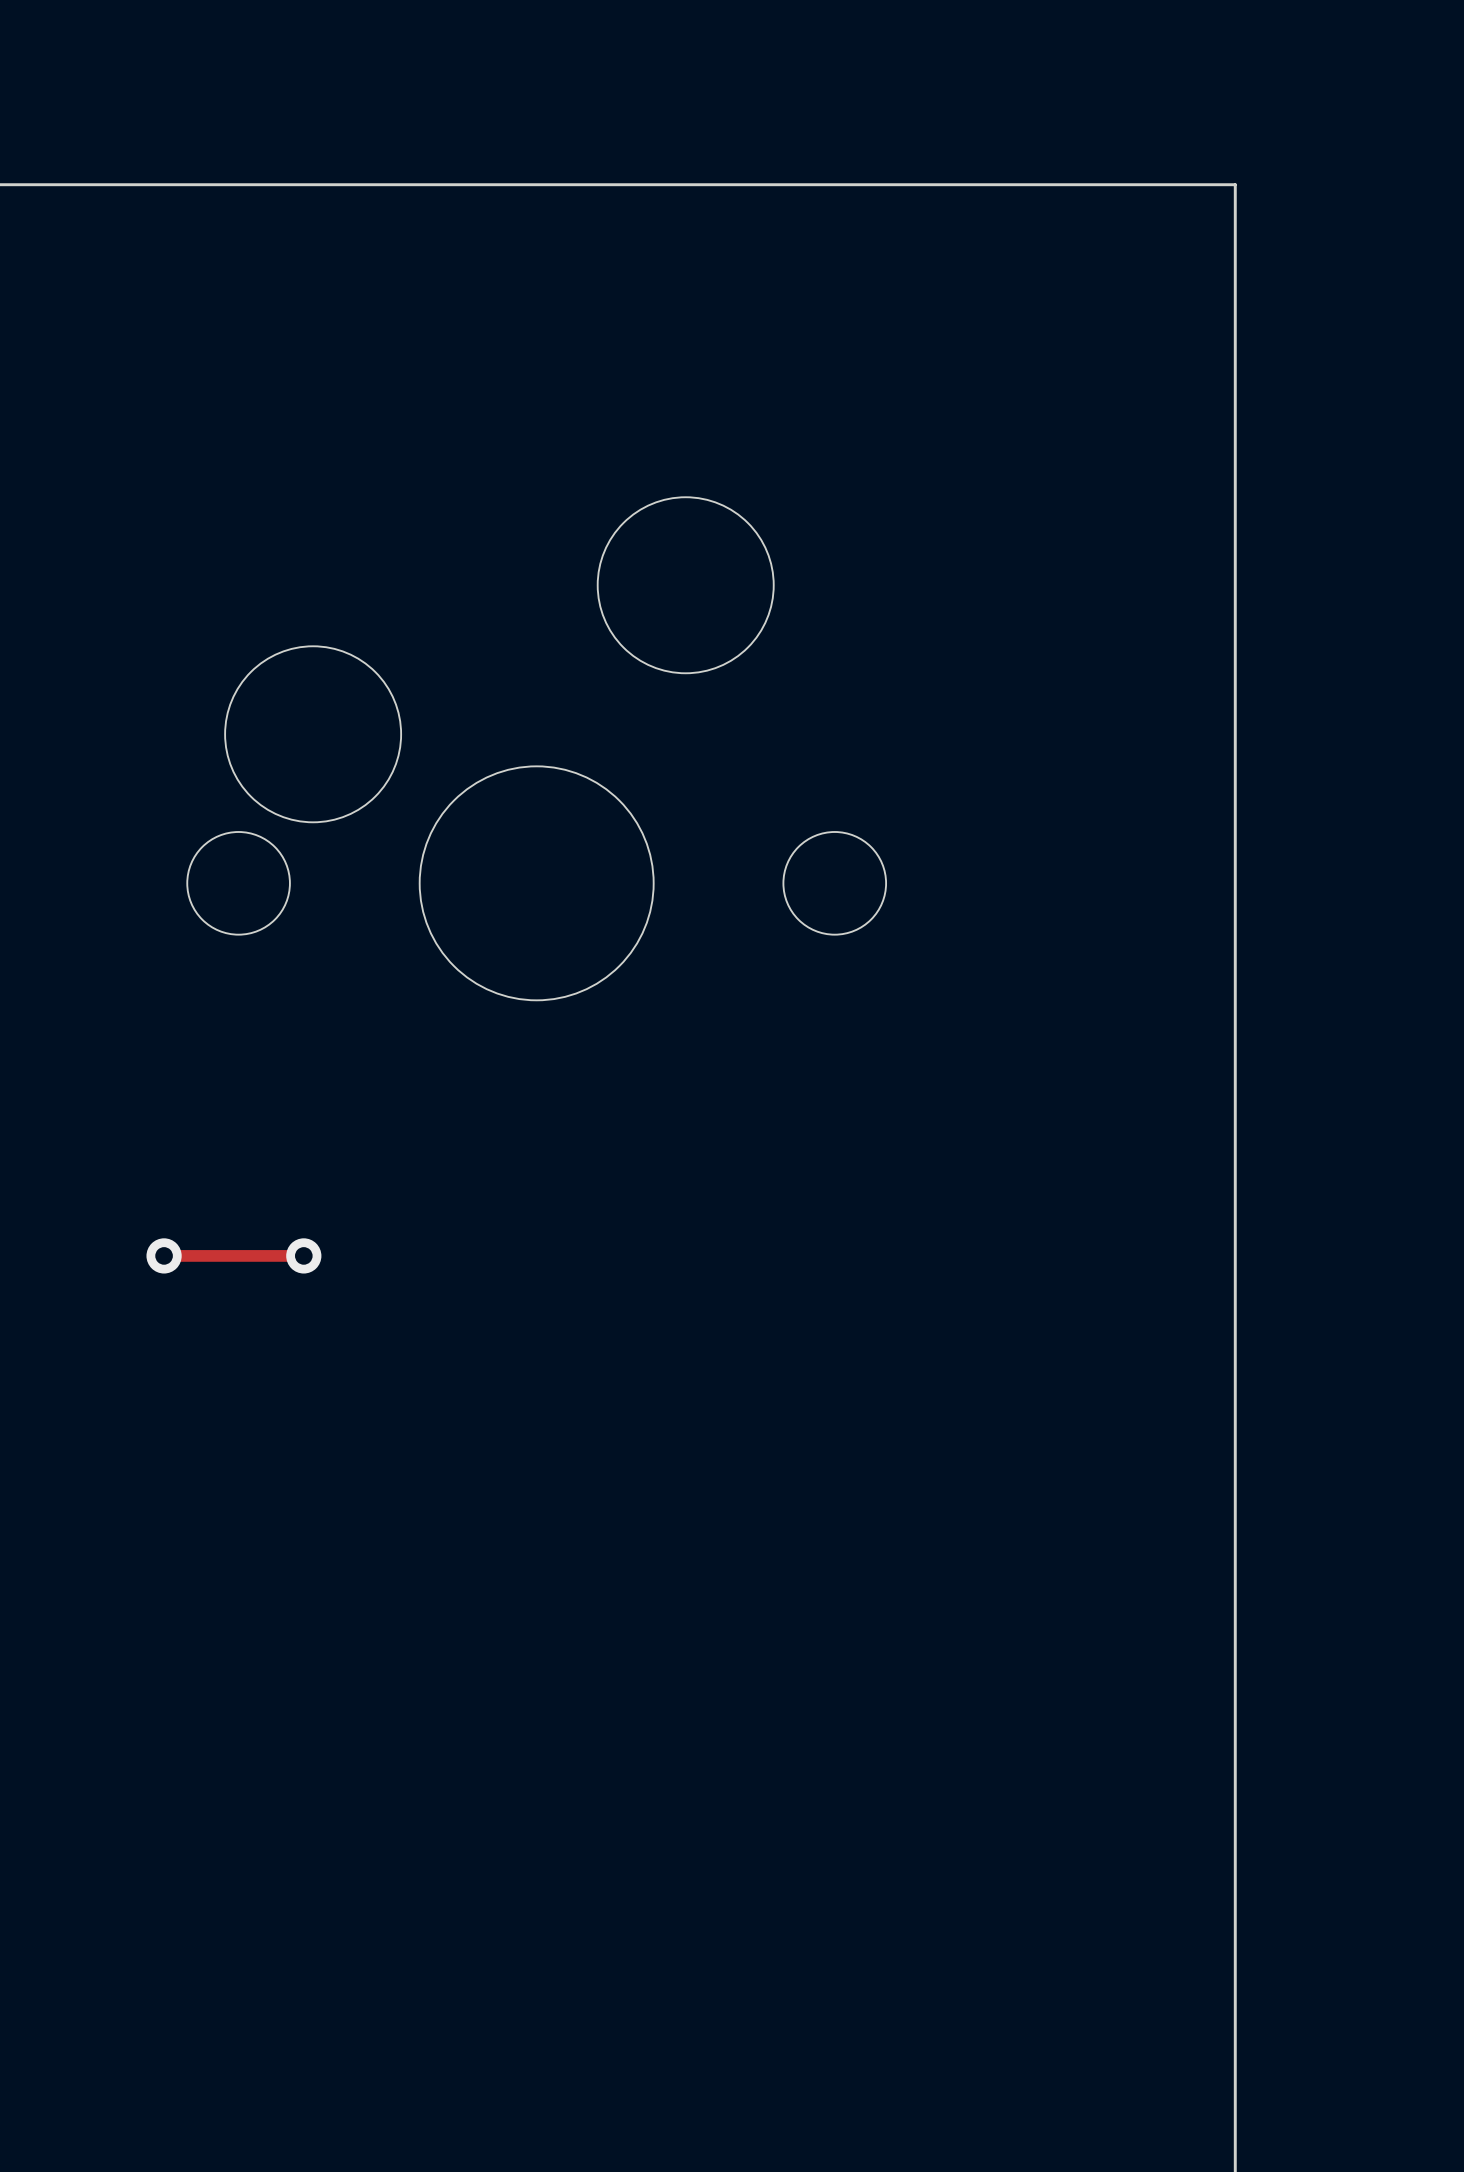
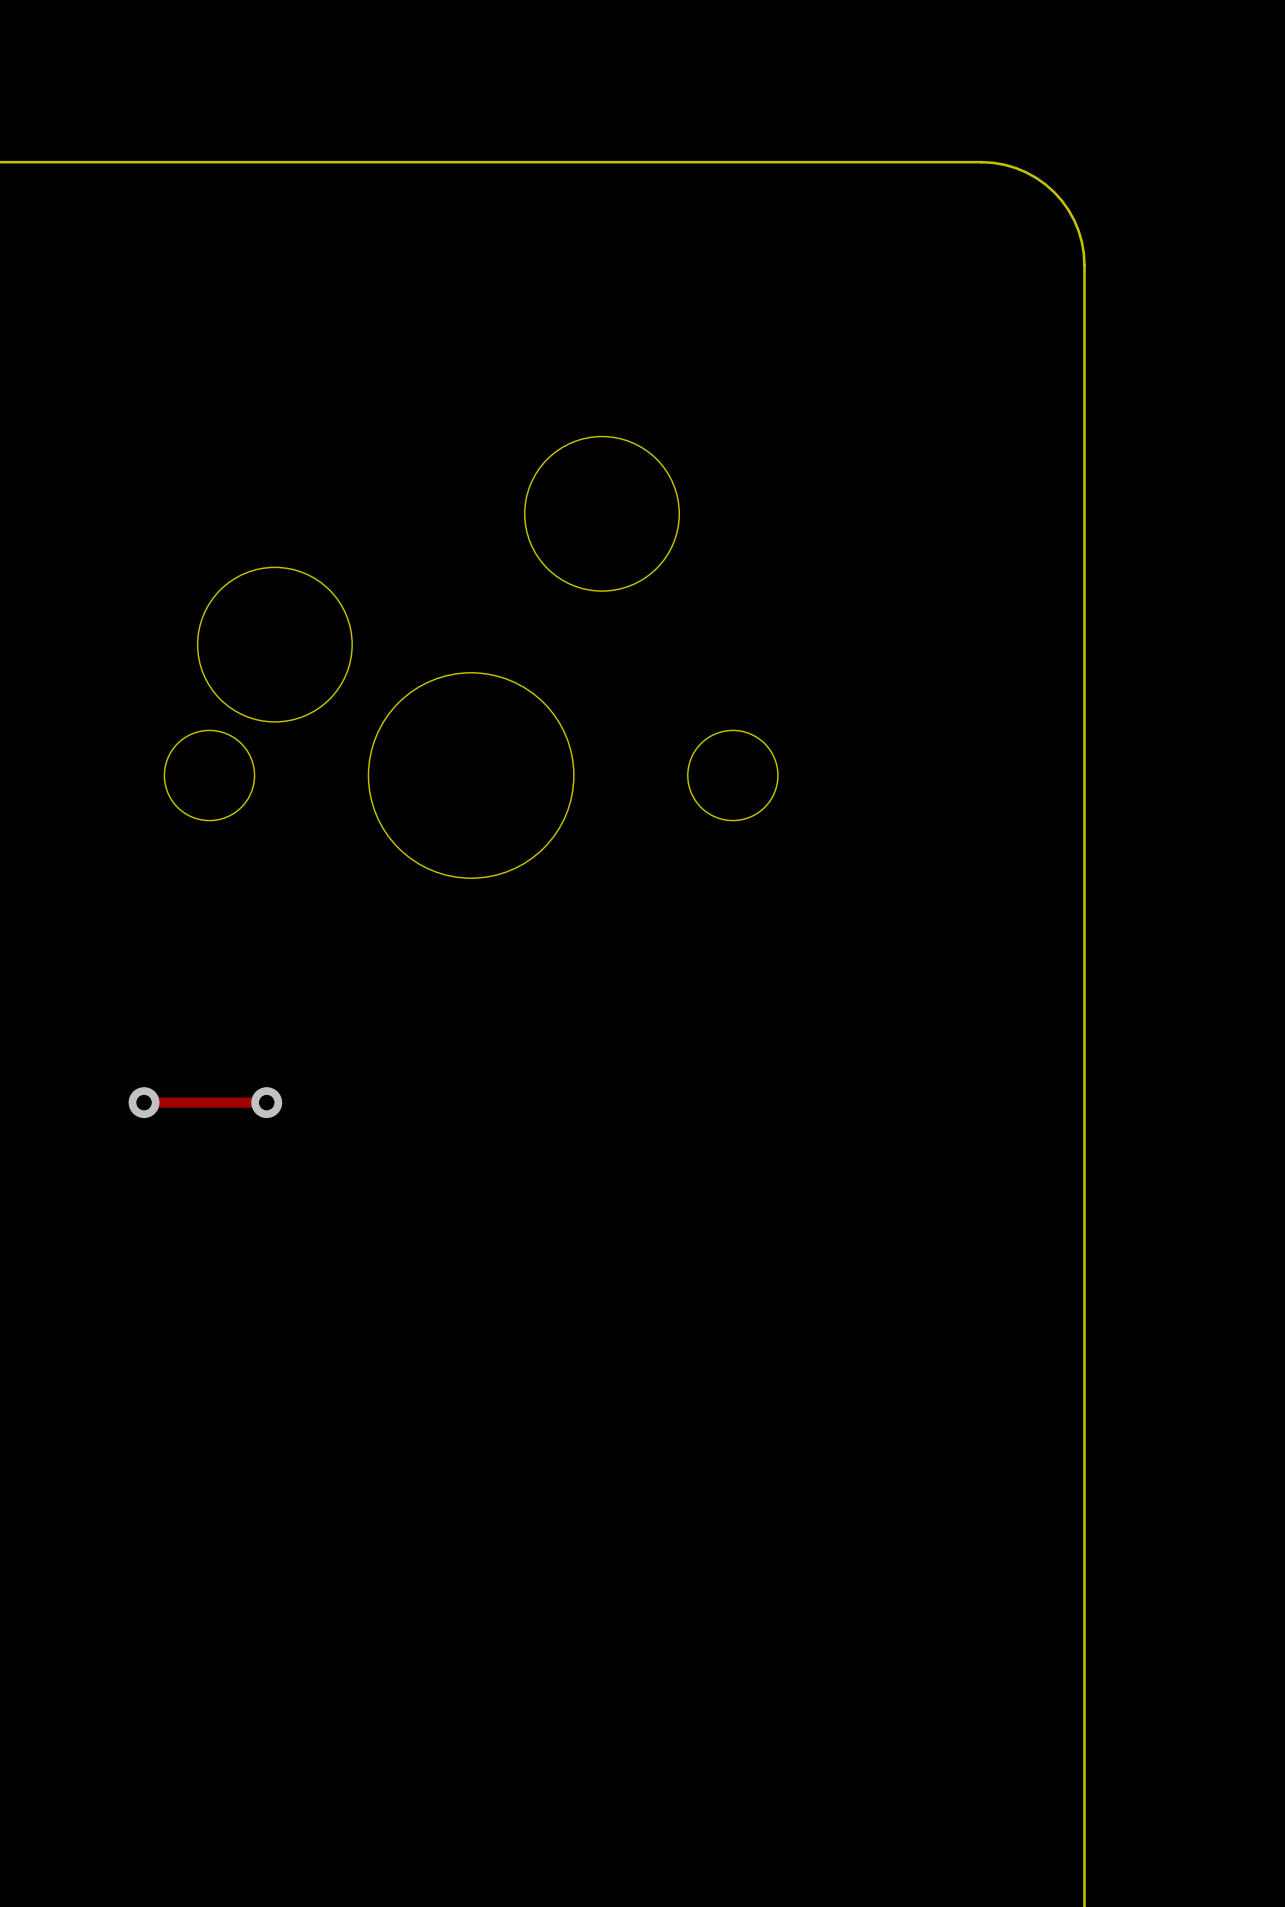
board edge: (1117, 184) (1235, 184) (1235, 302) -> (981, 162) (1015, 167) (1036, 177) (1054, 192) (1068, 210) (1078, 231) (1084, 265)

